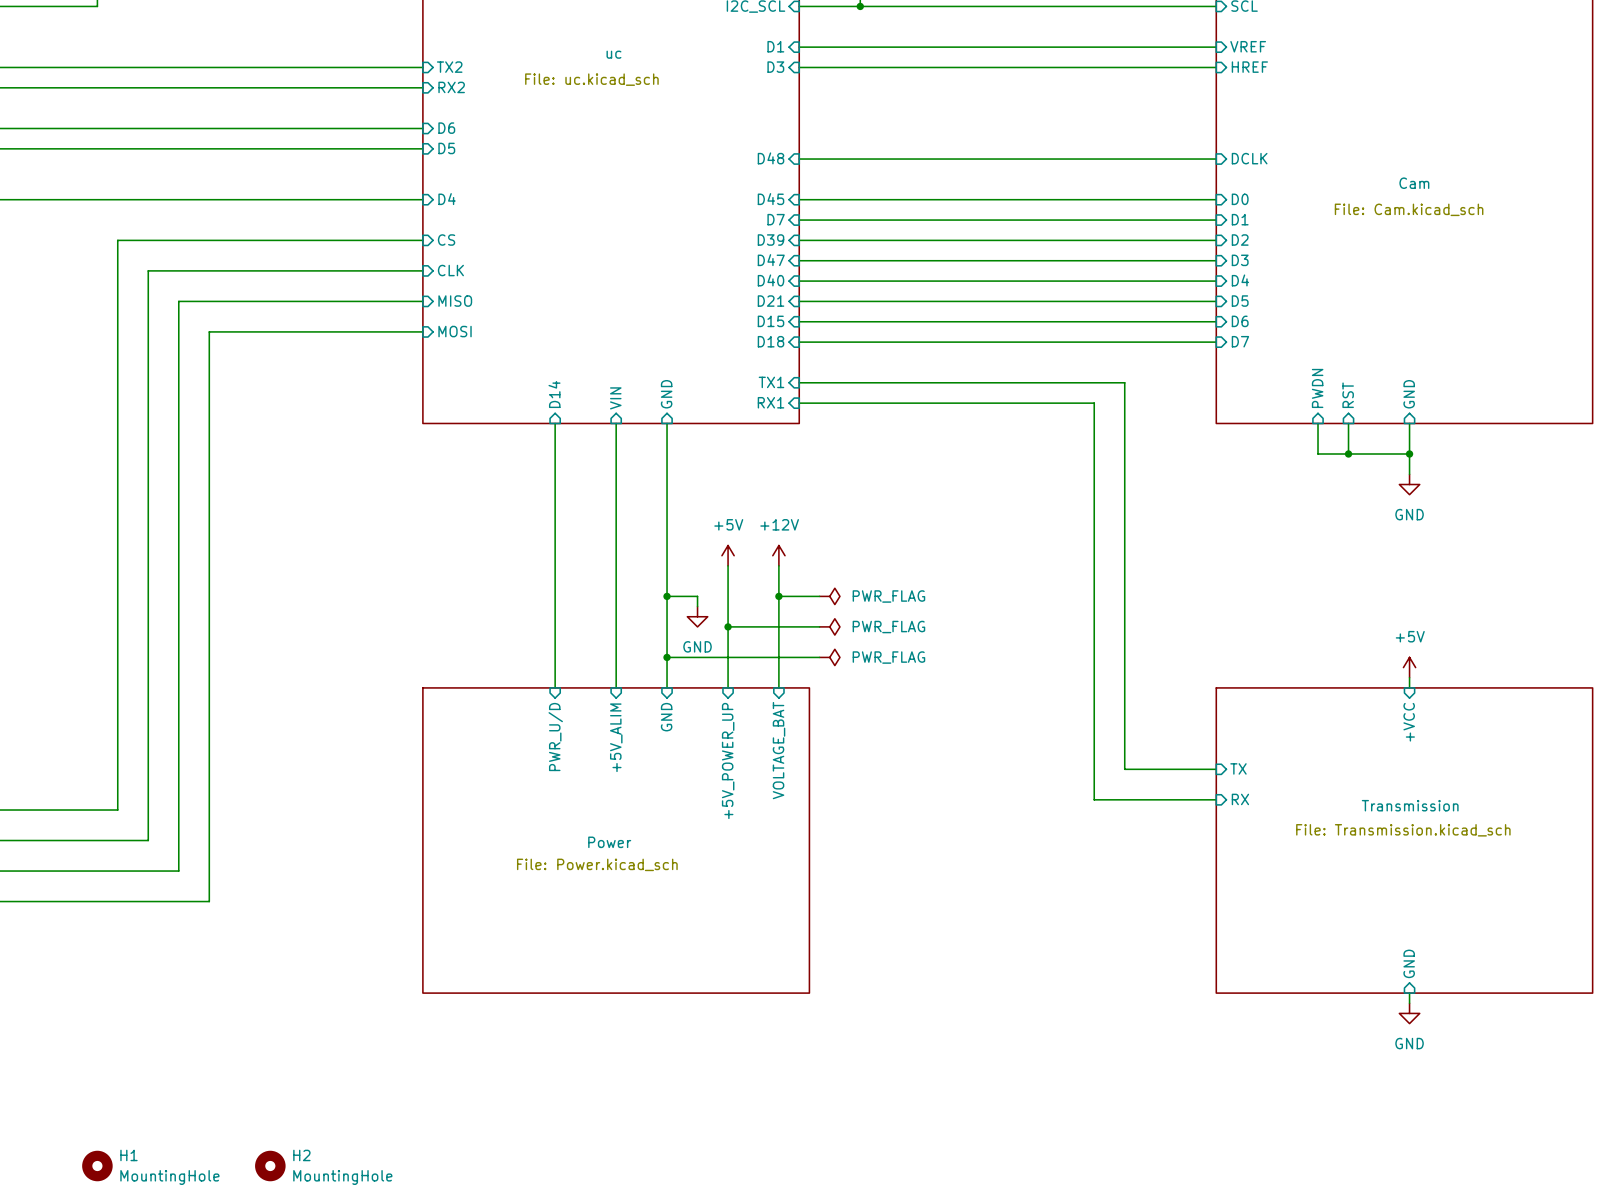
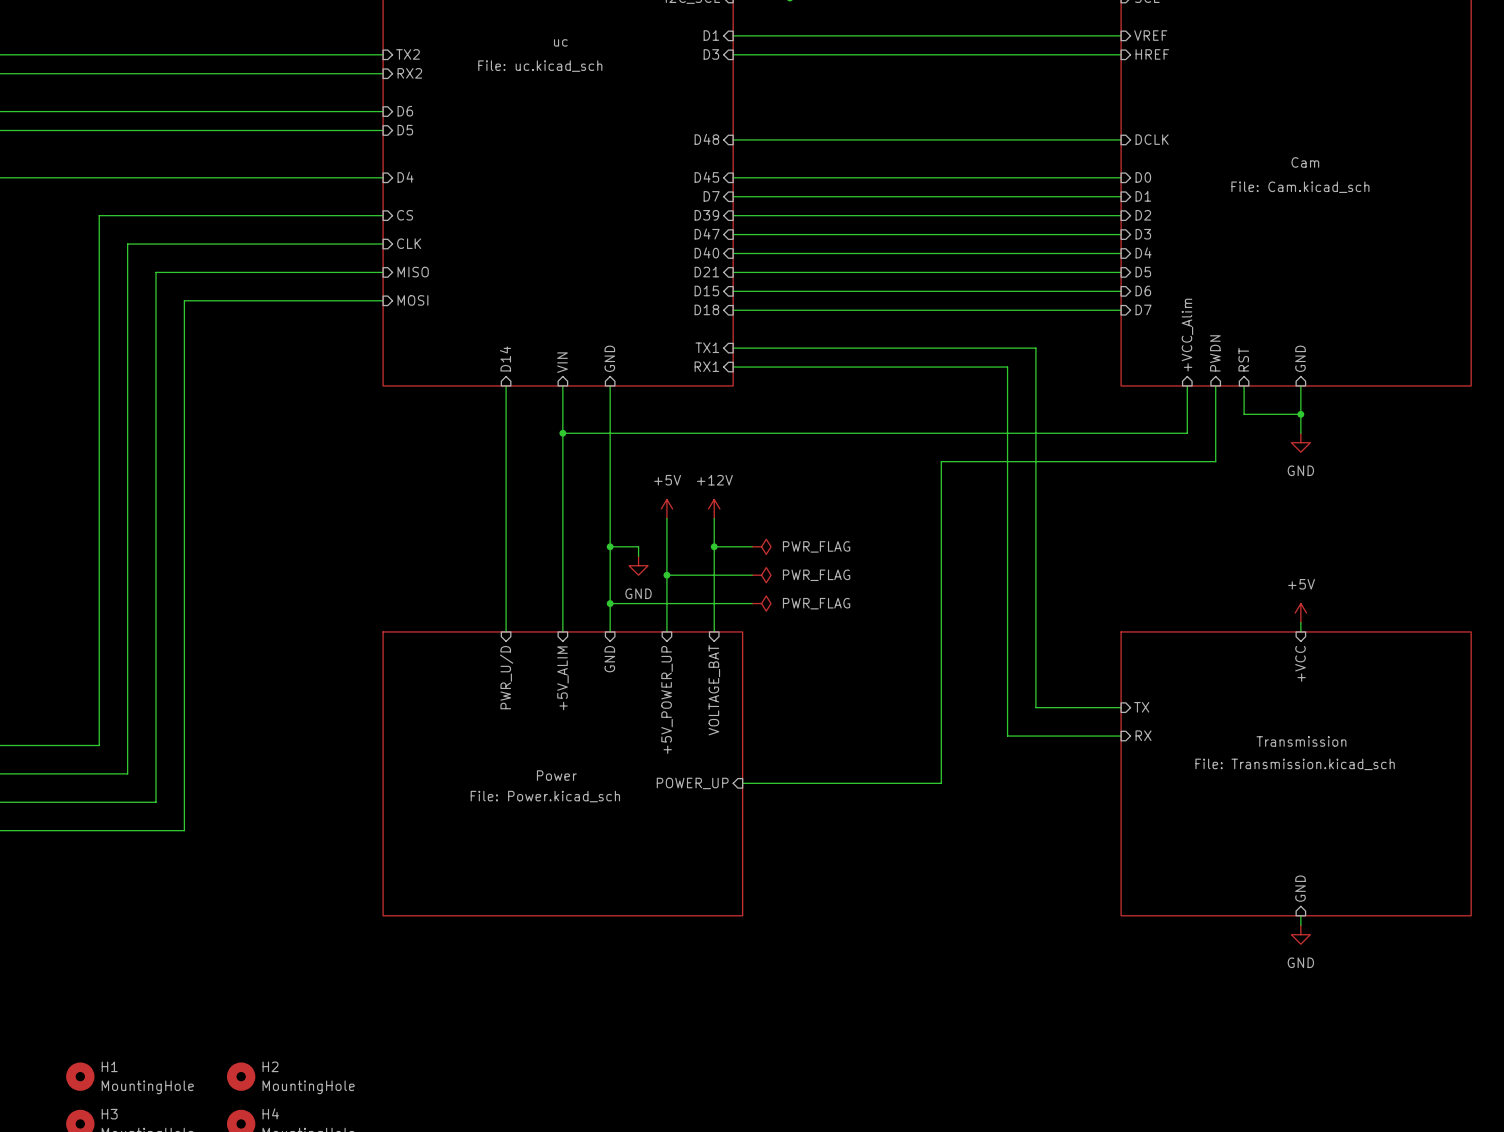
sheet pin: none -> +VCC_Alim (1187, 335)
wire: none -> (1187, 385) (1187, 433) (562, 433)
wire: (1318, 453) (1348, 453) -> (1215, 414) (1215, 461) (941, 461) (941, 783) (742, 783)
junction: (1348, 453) -> none
junction: none -> (562, 433)
sheet pin: none -> POWER_UP (692, 783)

